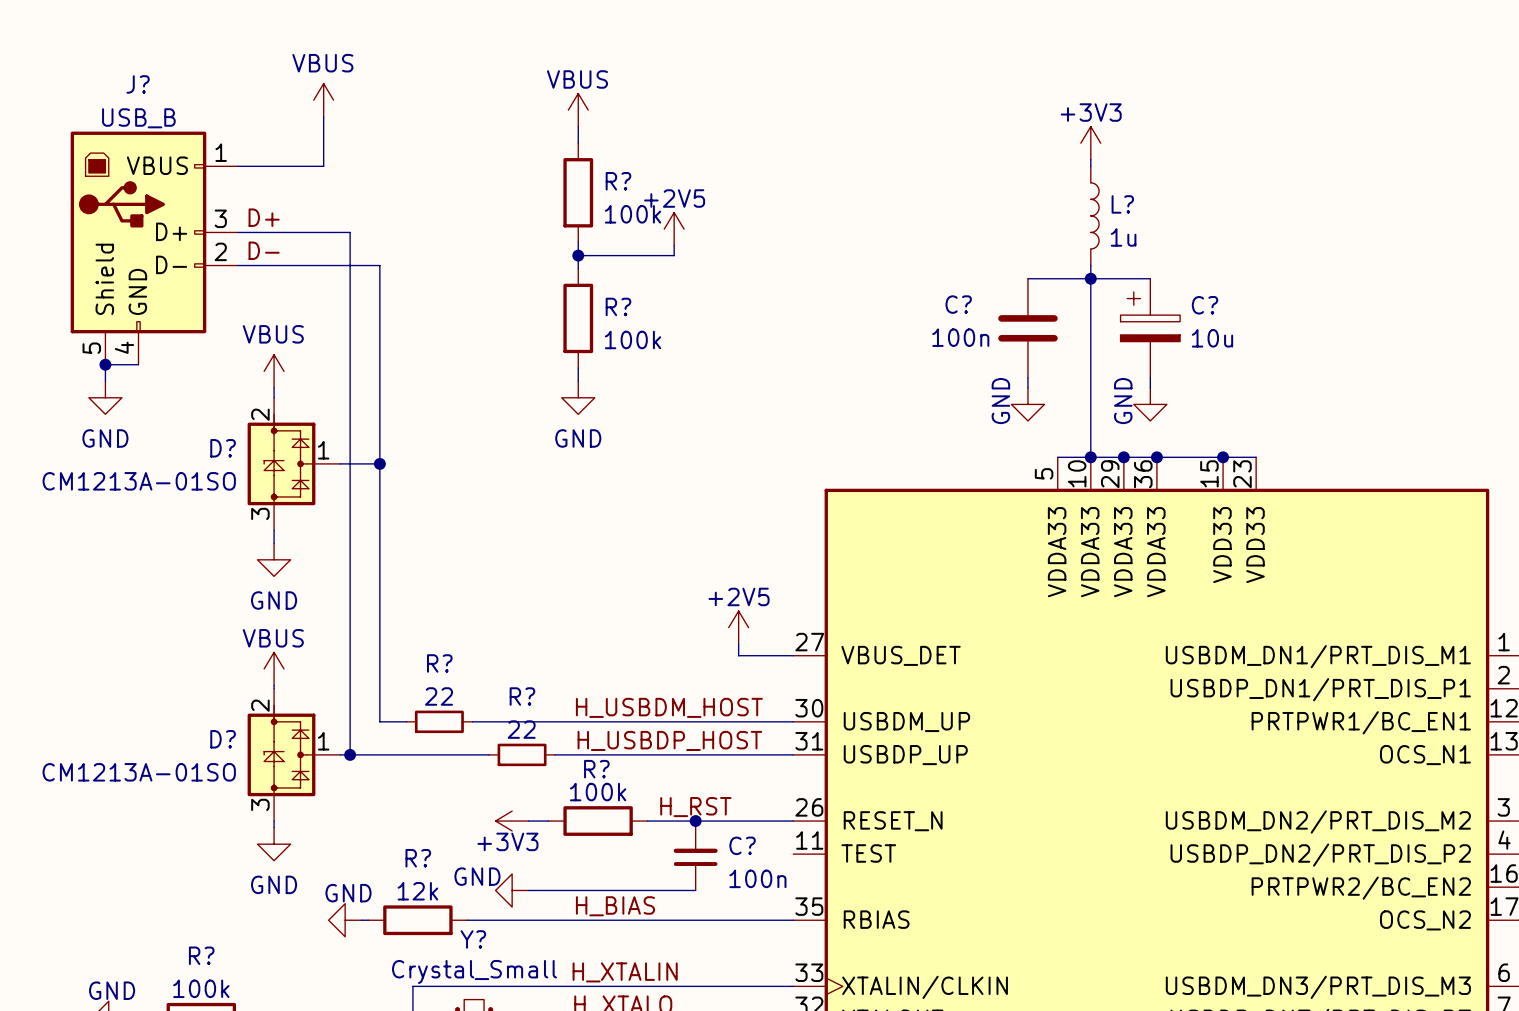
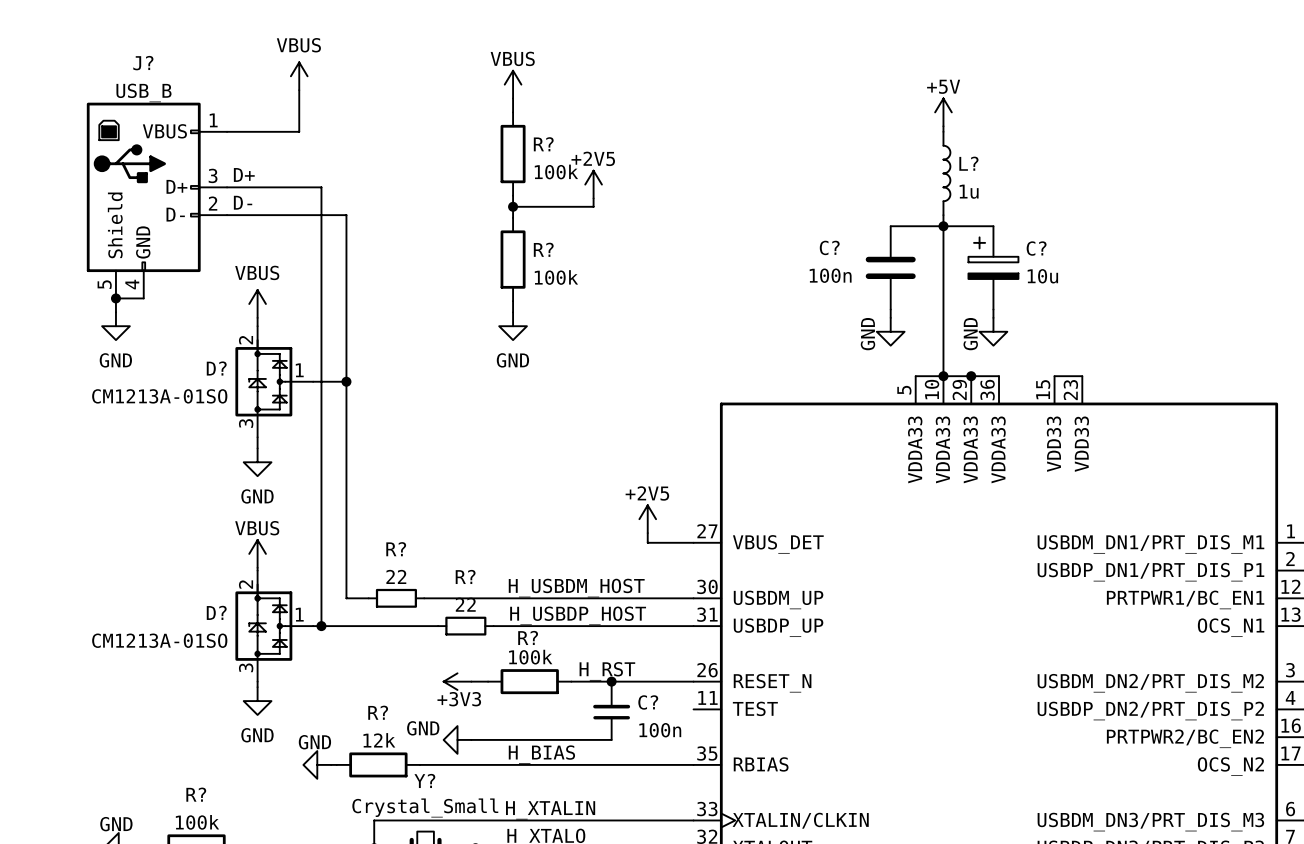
power symbol: +3V3 (1090, 143) -> +5V (943, 112)
wire: (1156, 457) (1223, 457) -> none
junction: (1156, 457) -> none
junction: (1223, 457) -> none

